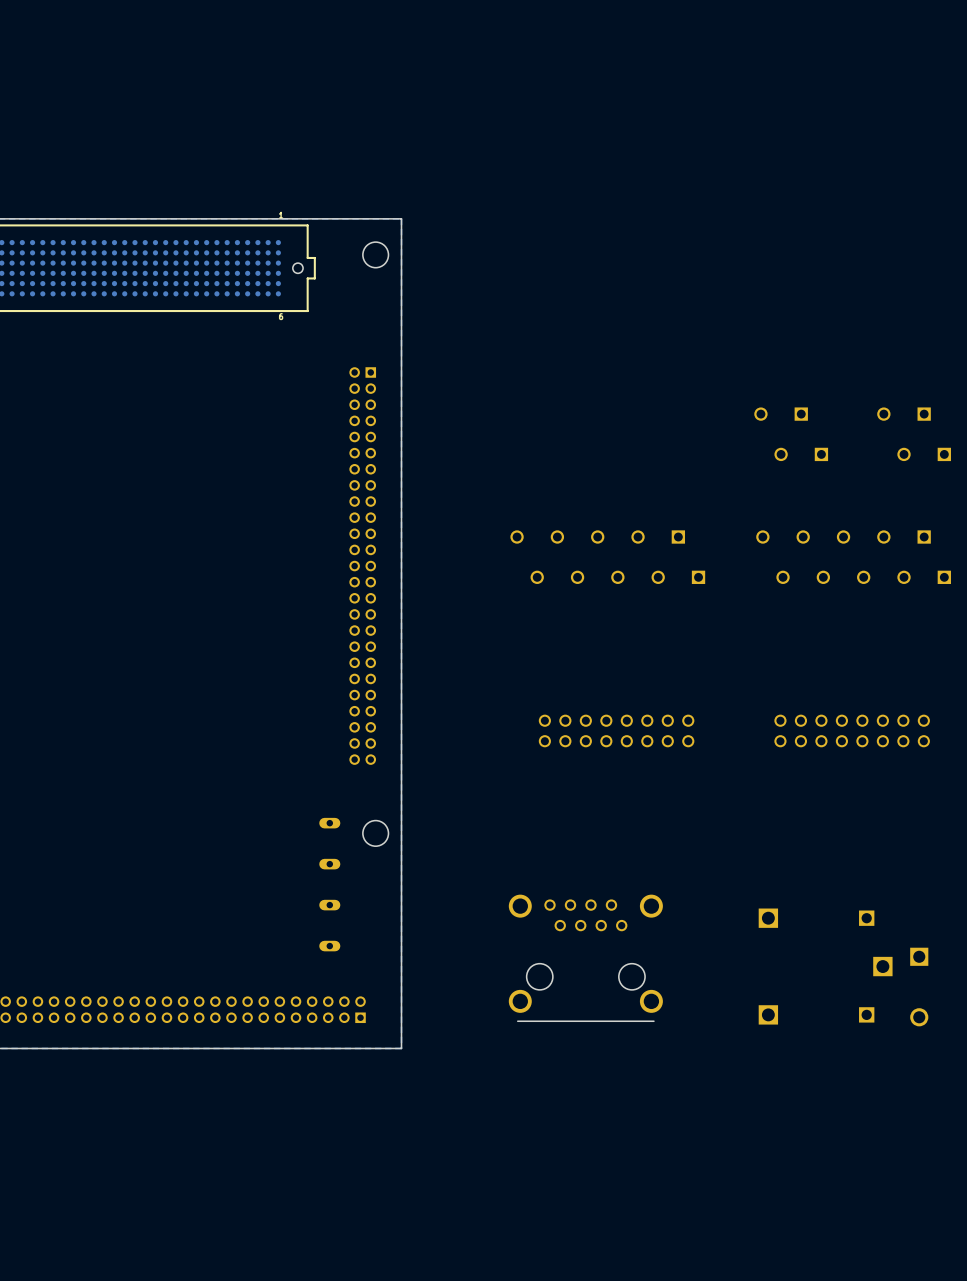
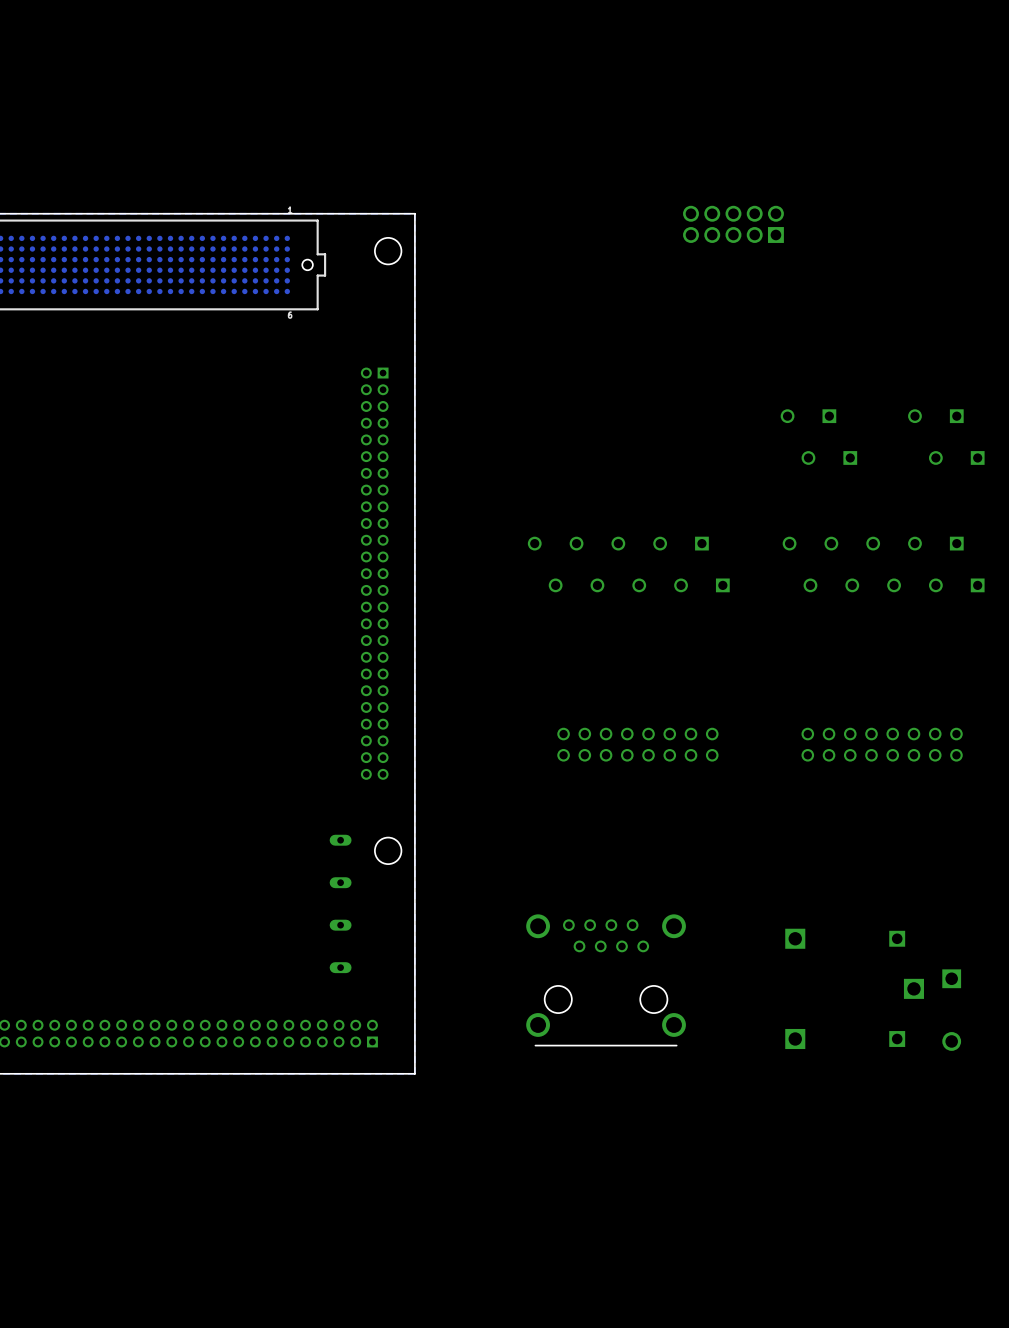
part: none -> (733, 224)

